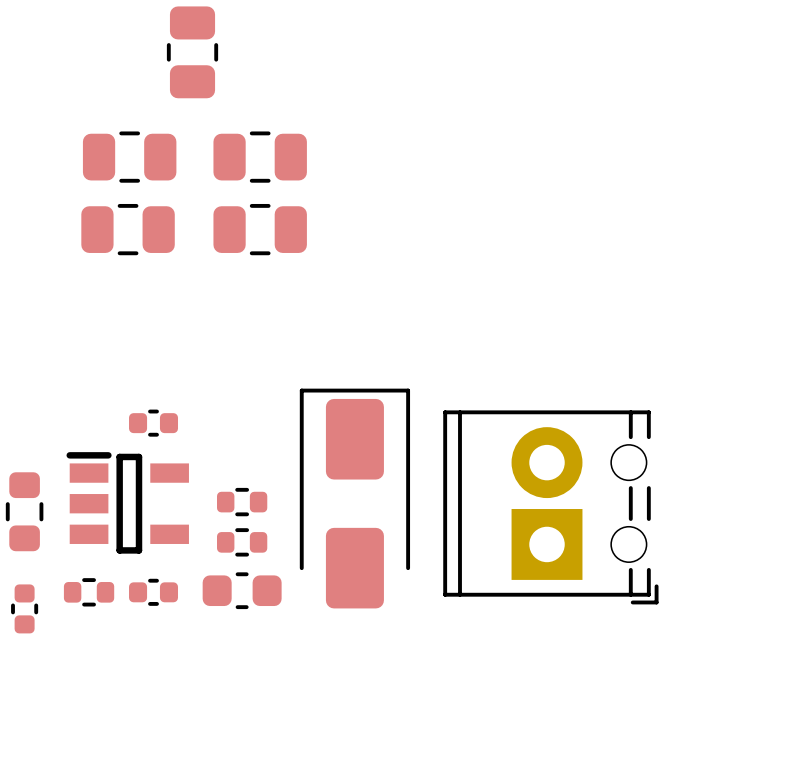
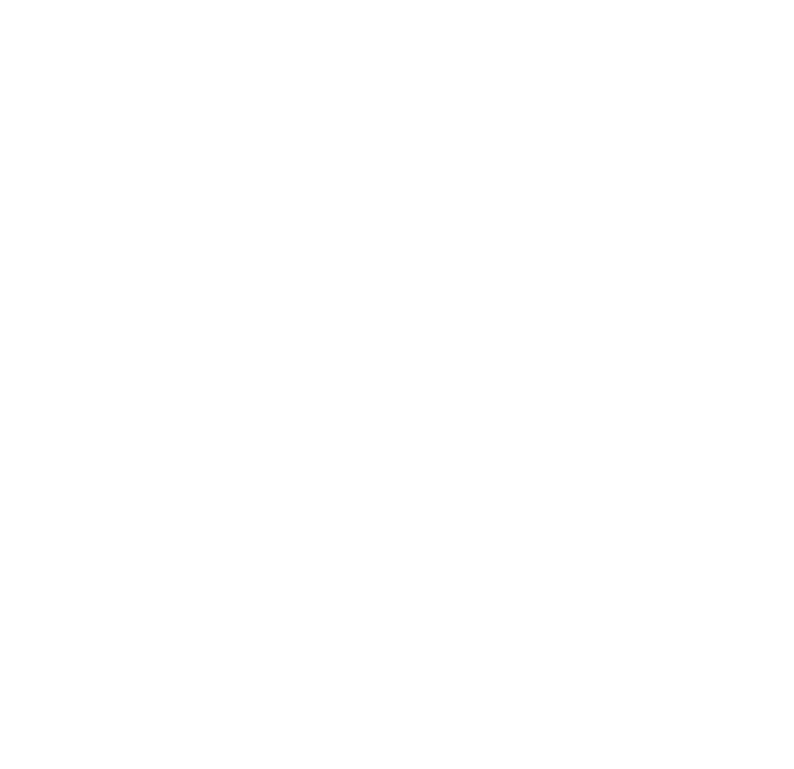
part: (192, 52) -> none
part: (129, 157) -> none
part: (260, 157) -> none
part: (128, 229) -> none
part: (260, 229) -> none
part: (153, 423) -> none
part: (354, 498) -> none
part: (127, 502) -> none
part: (242, 502) -> none
part: (550, 507) -> none
part: (24, 511) -> none
part: (242, 542) -> none
part: (242, 590) -> none
part: (89, 592) -> none
part: (153, 592) -> none
part: (24, 608) -> none

